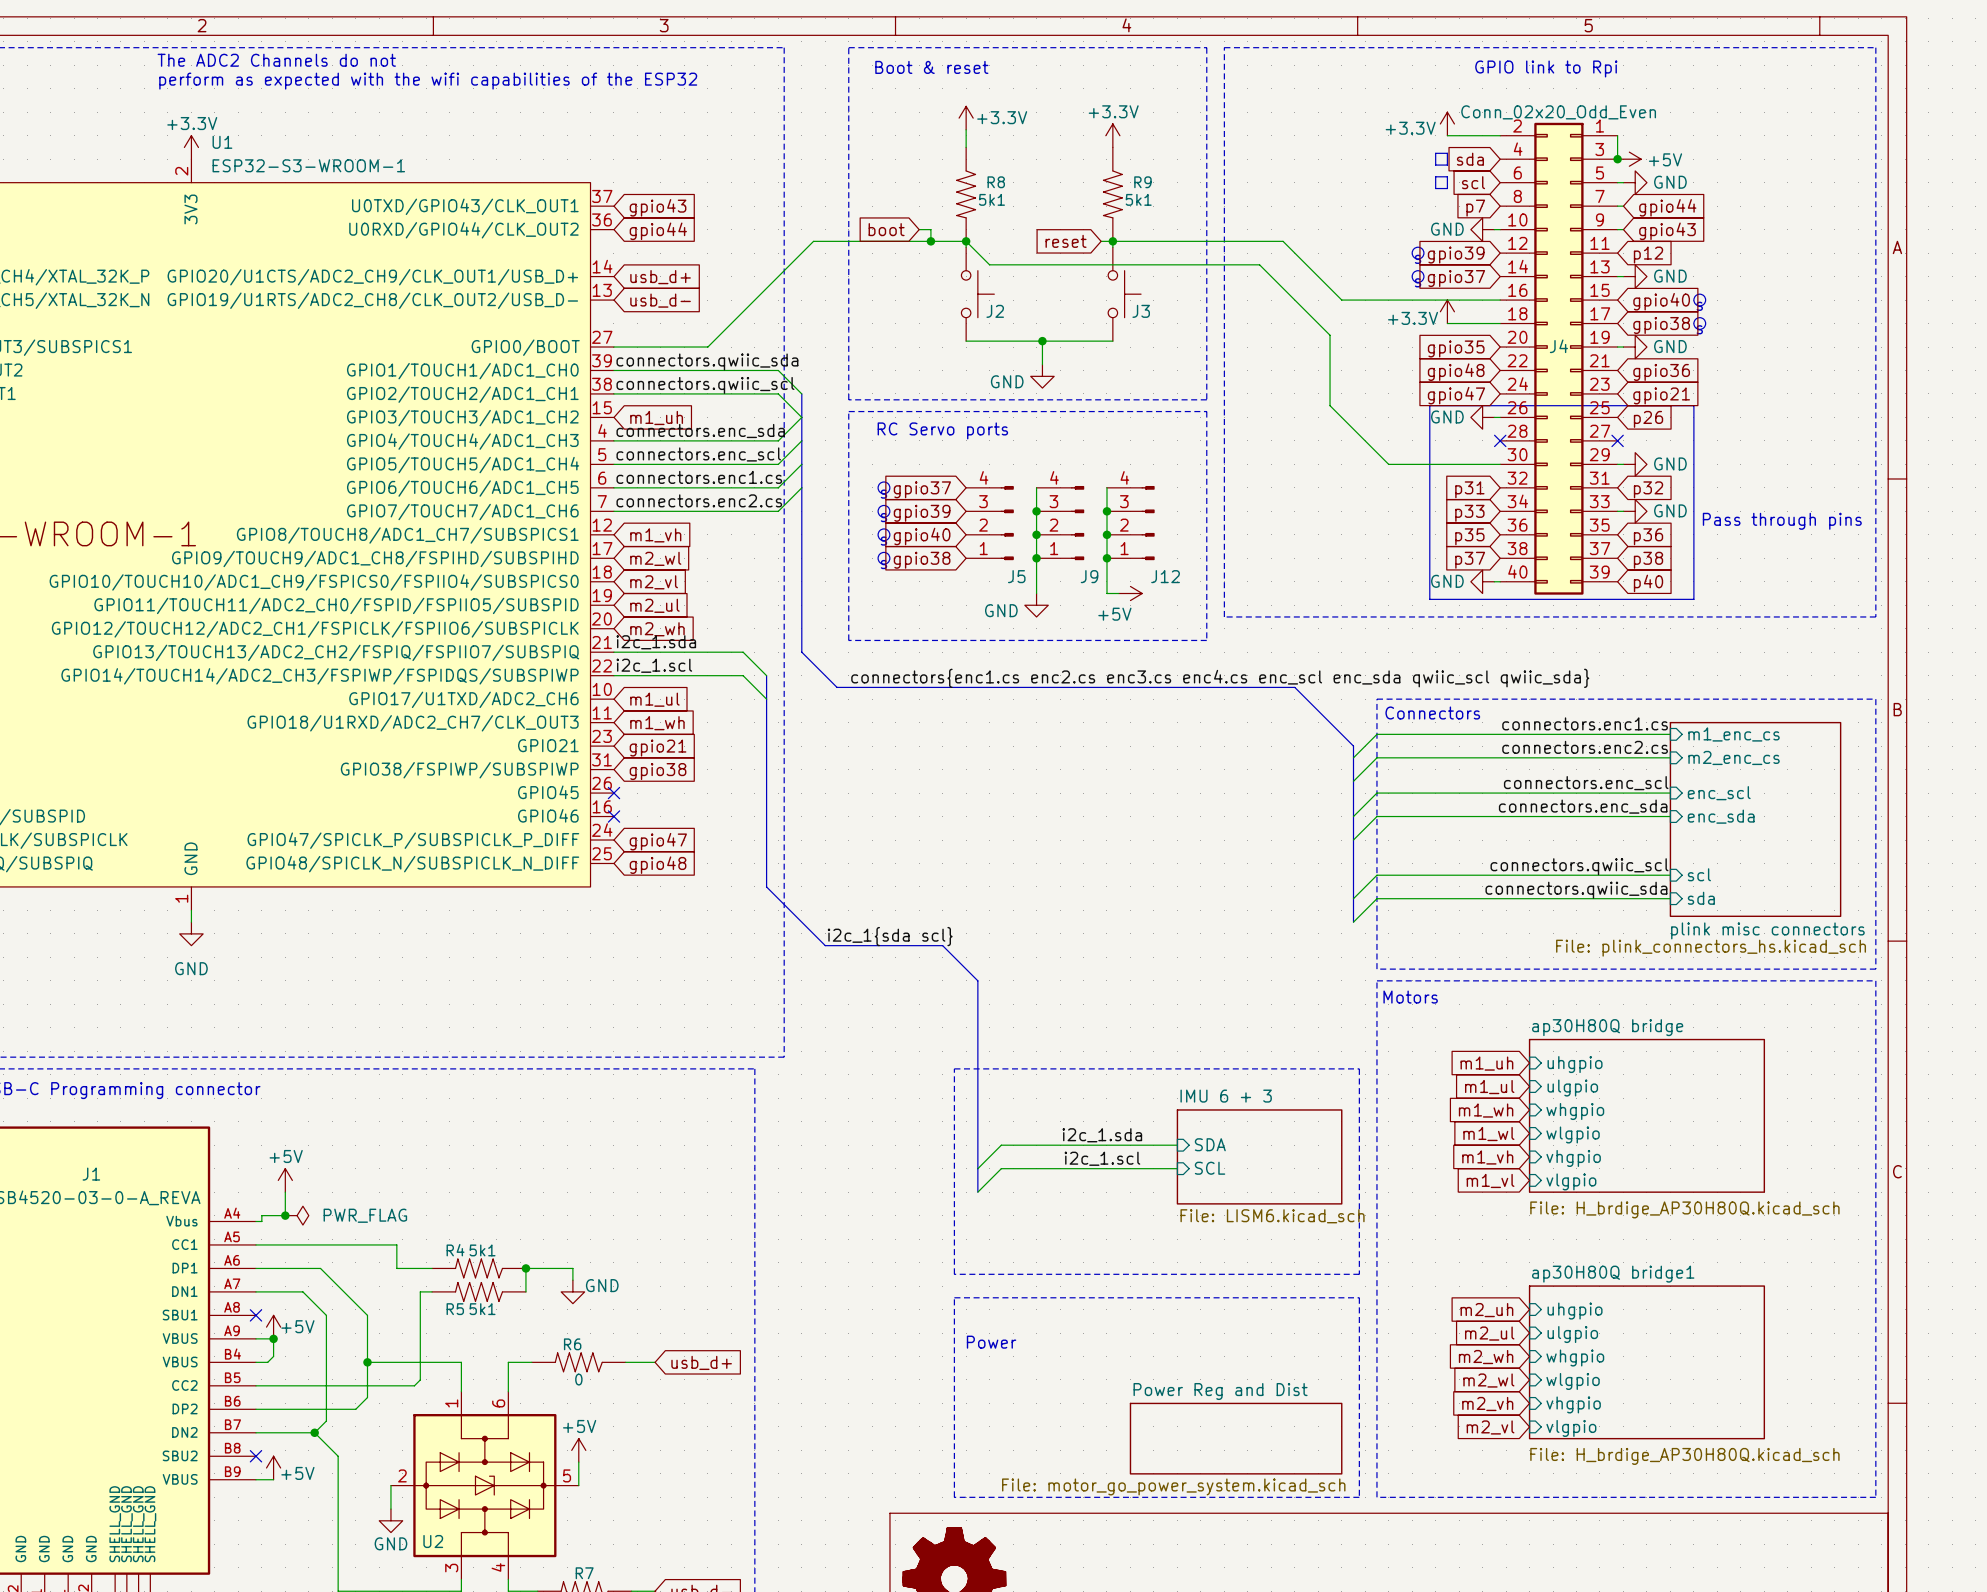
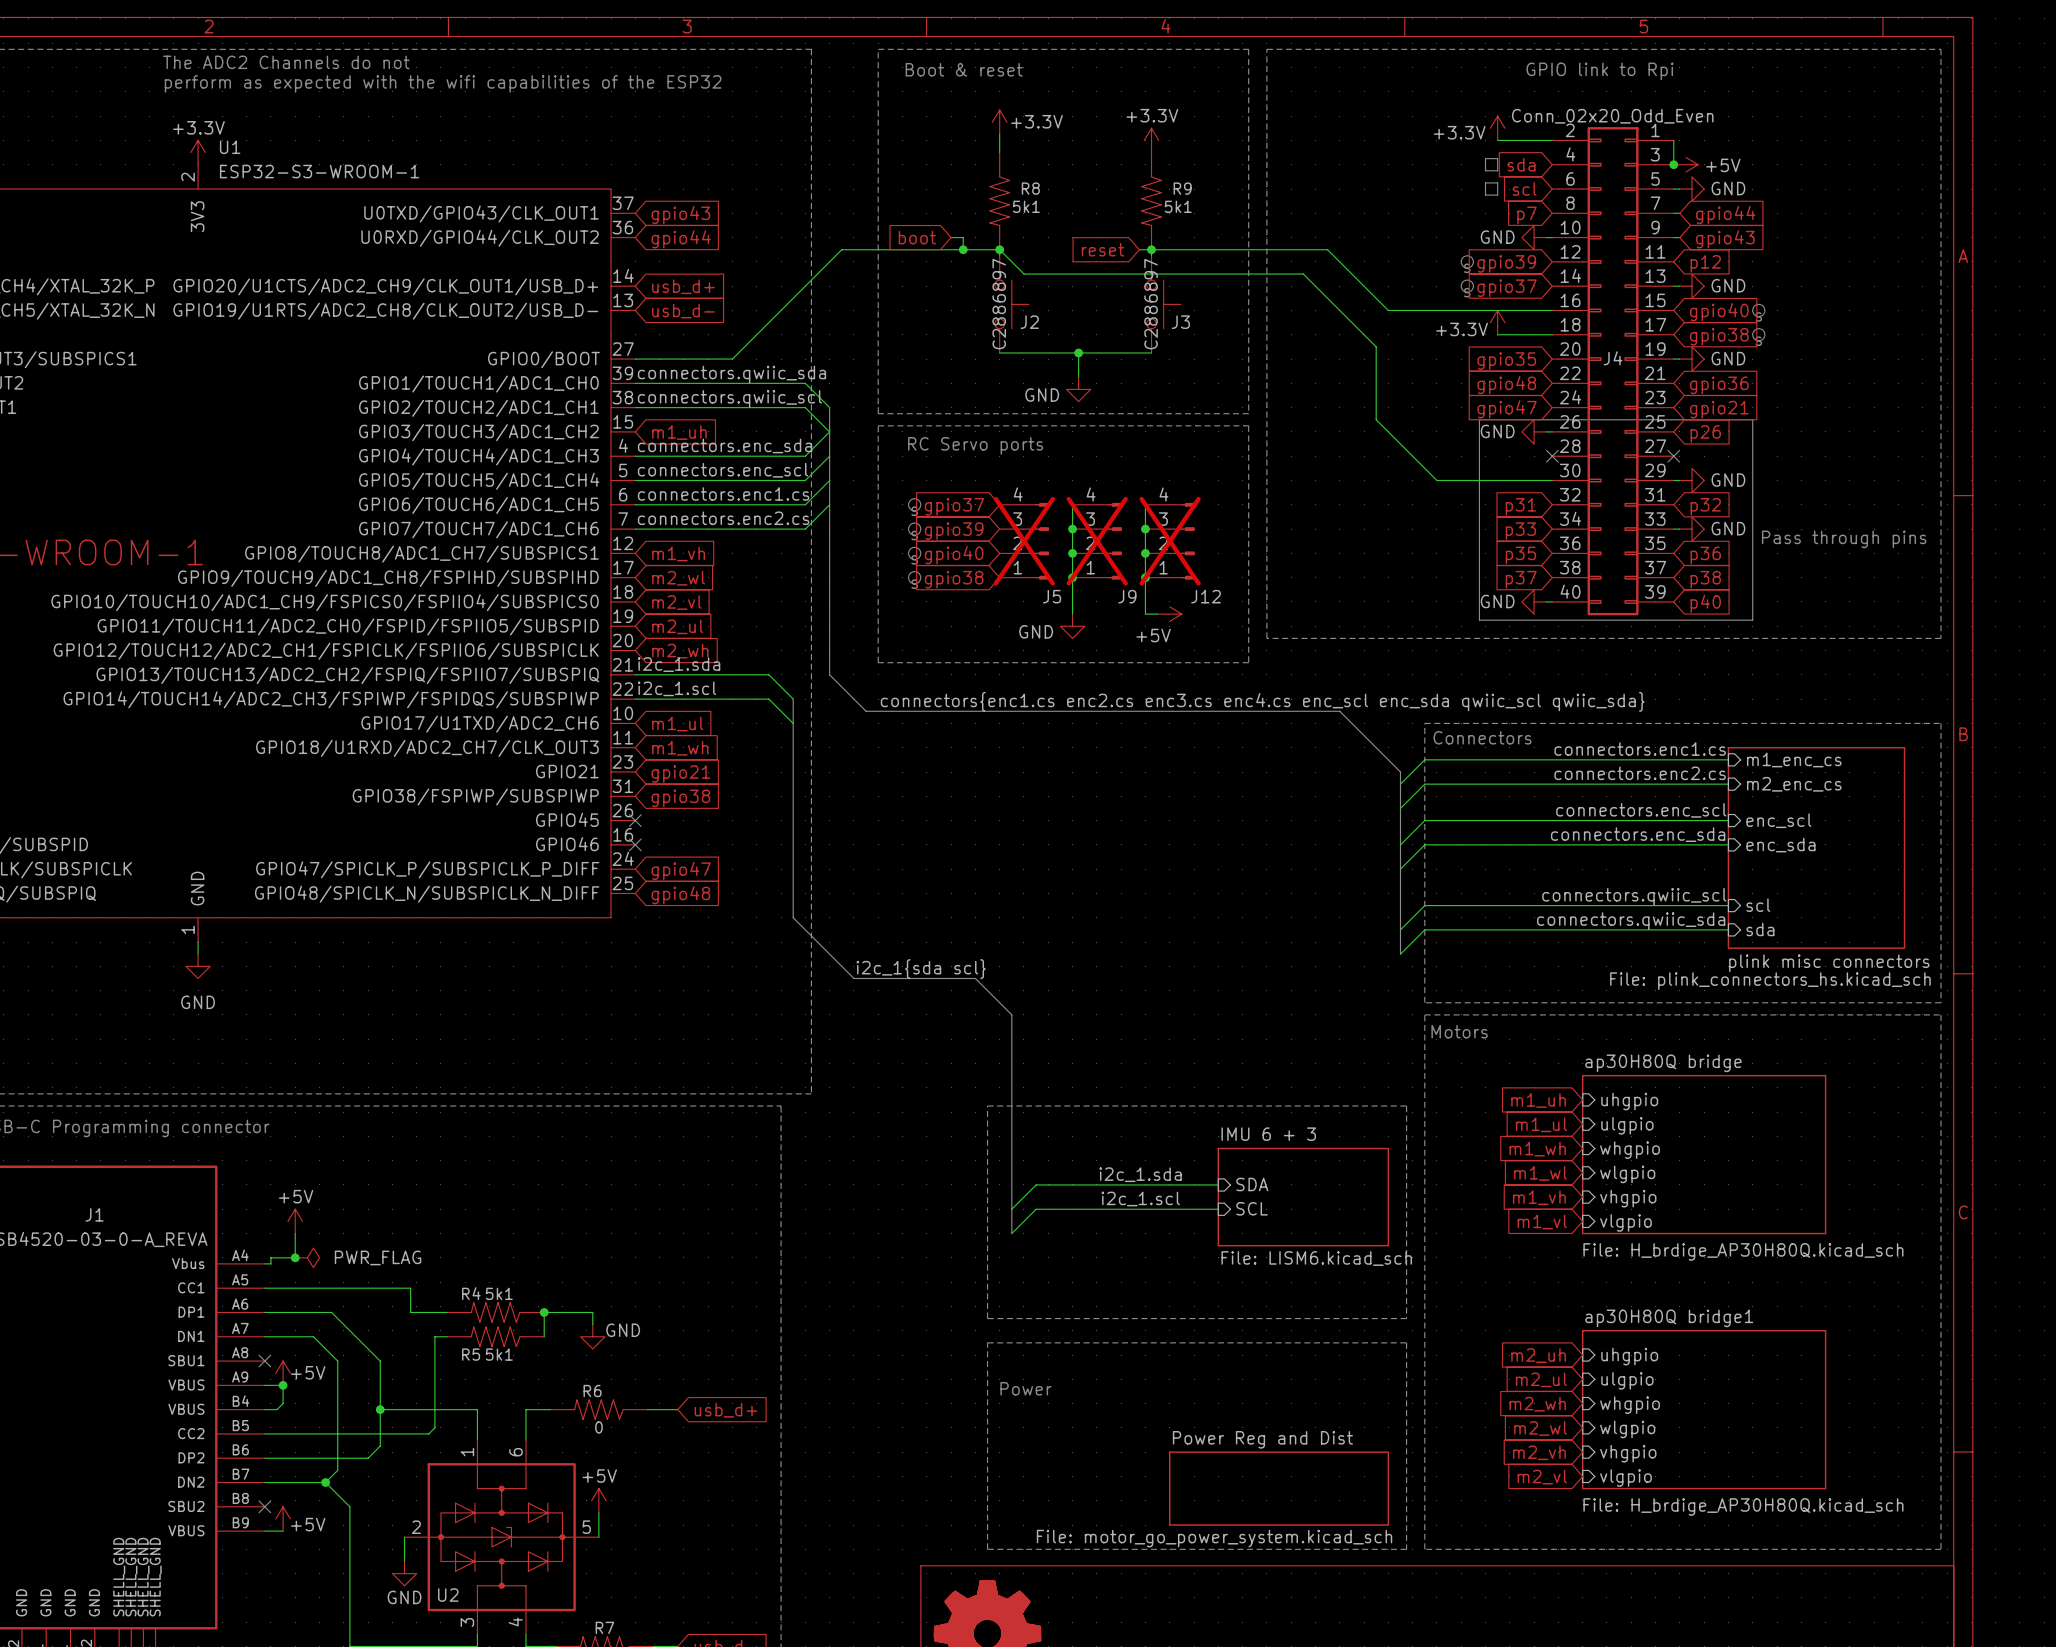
J2 value: none -> C2886897 (999, 304)
J3 value: none -> C2886897 (1151, 304)
J5 do-not-place cross: none -> (1024, 541)
J9 do-not-place cross: none -> (1097, 541)
J12 do-not-place cross: none -> (1170, 541)

